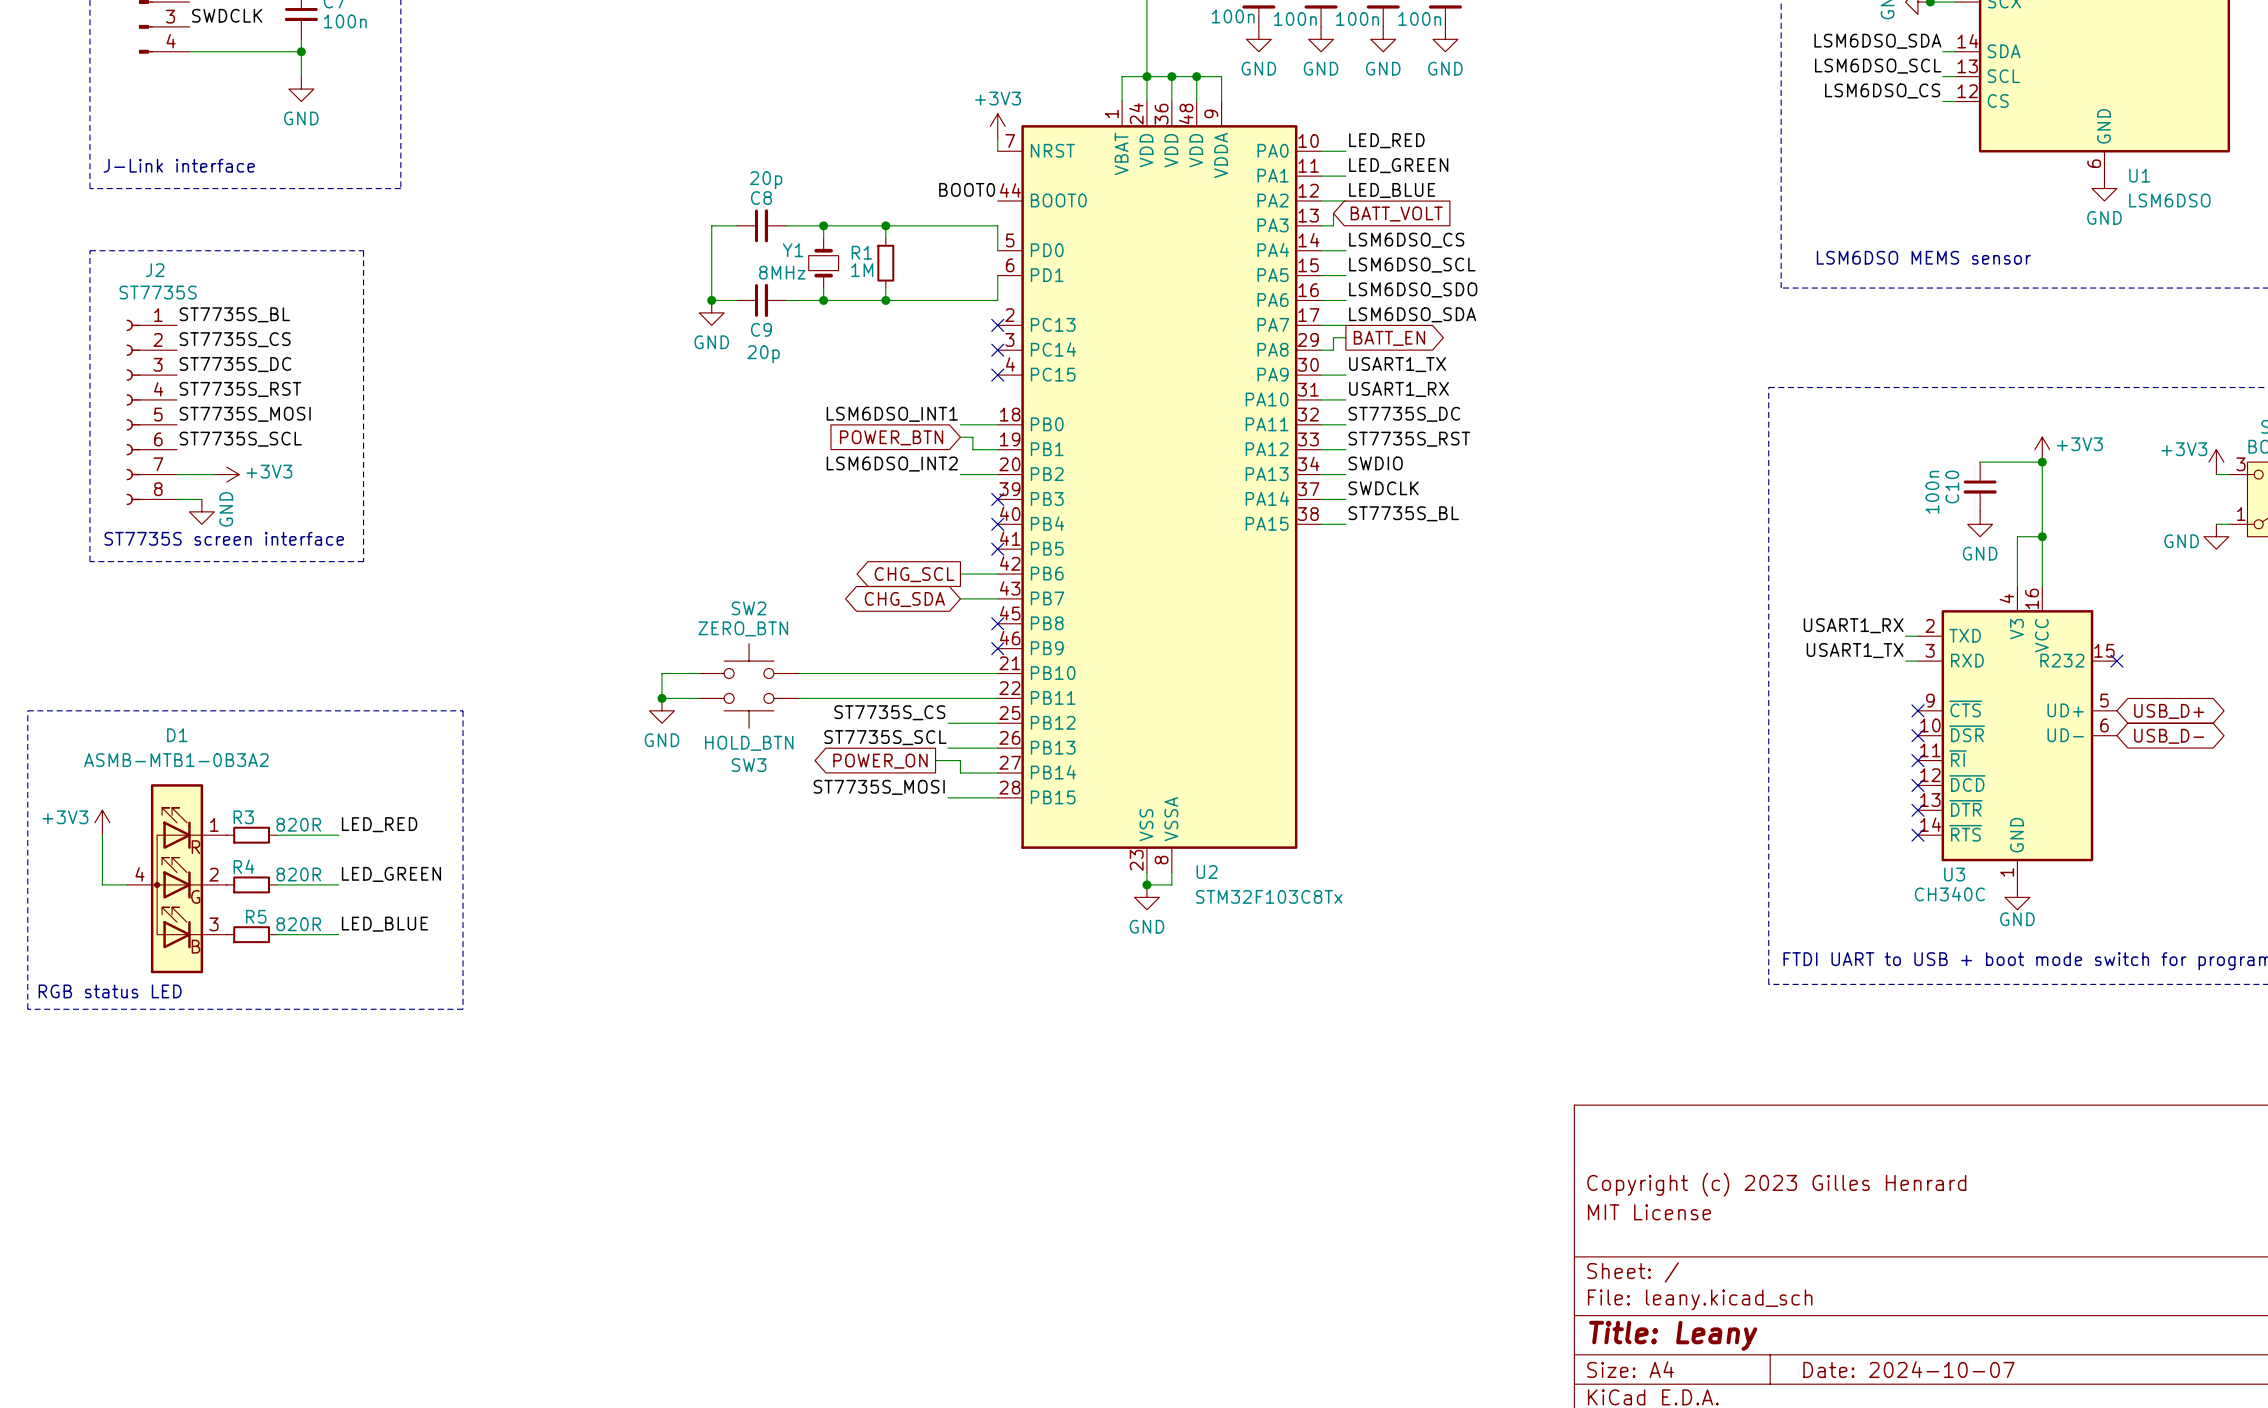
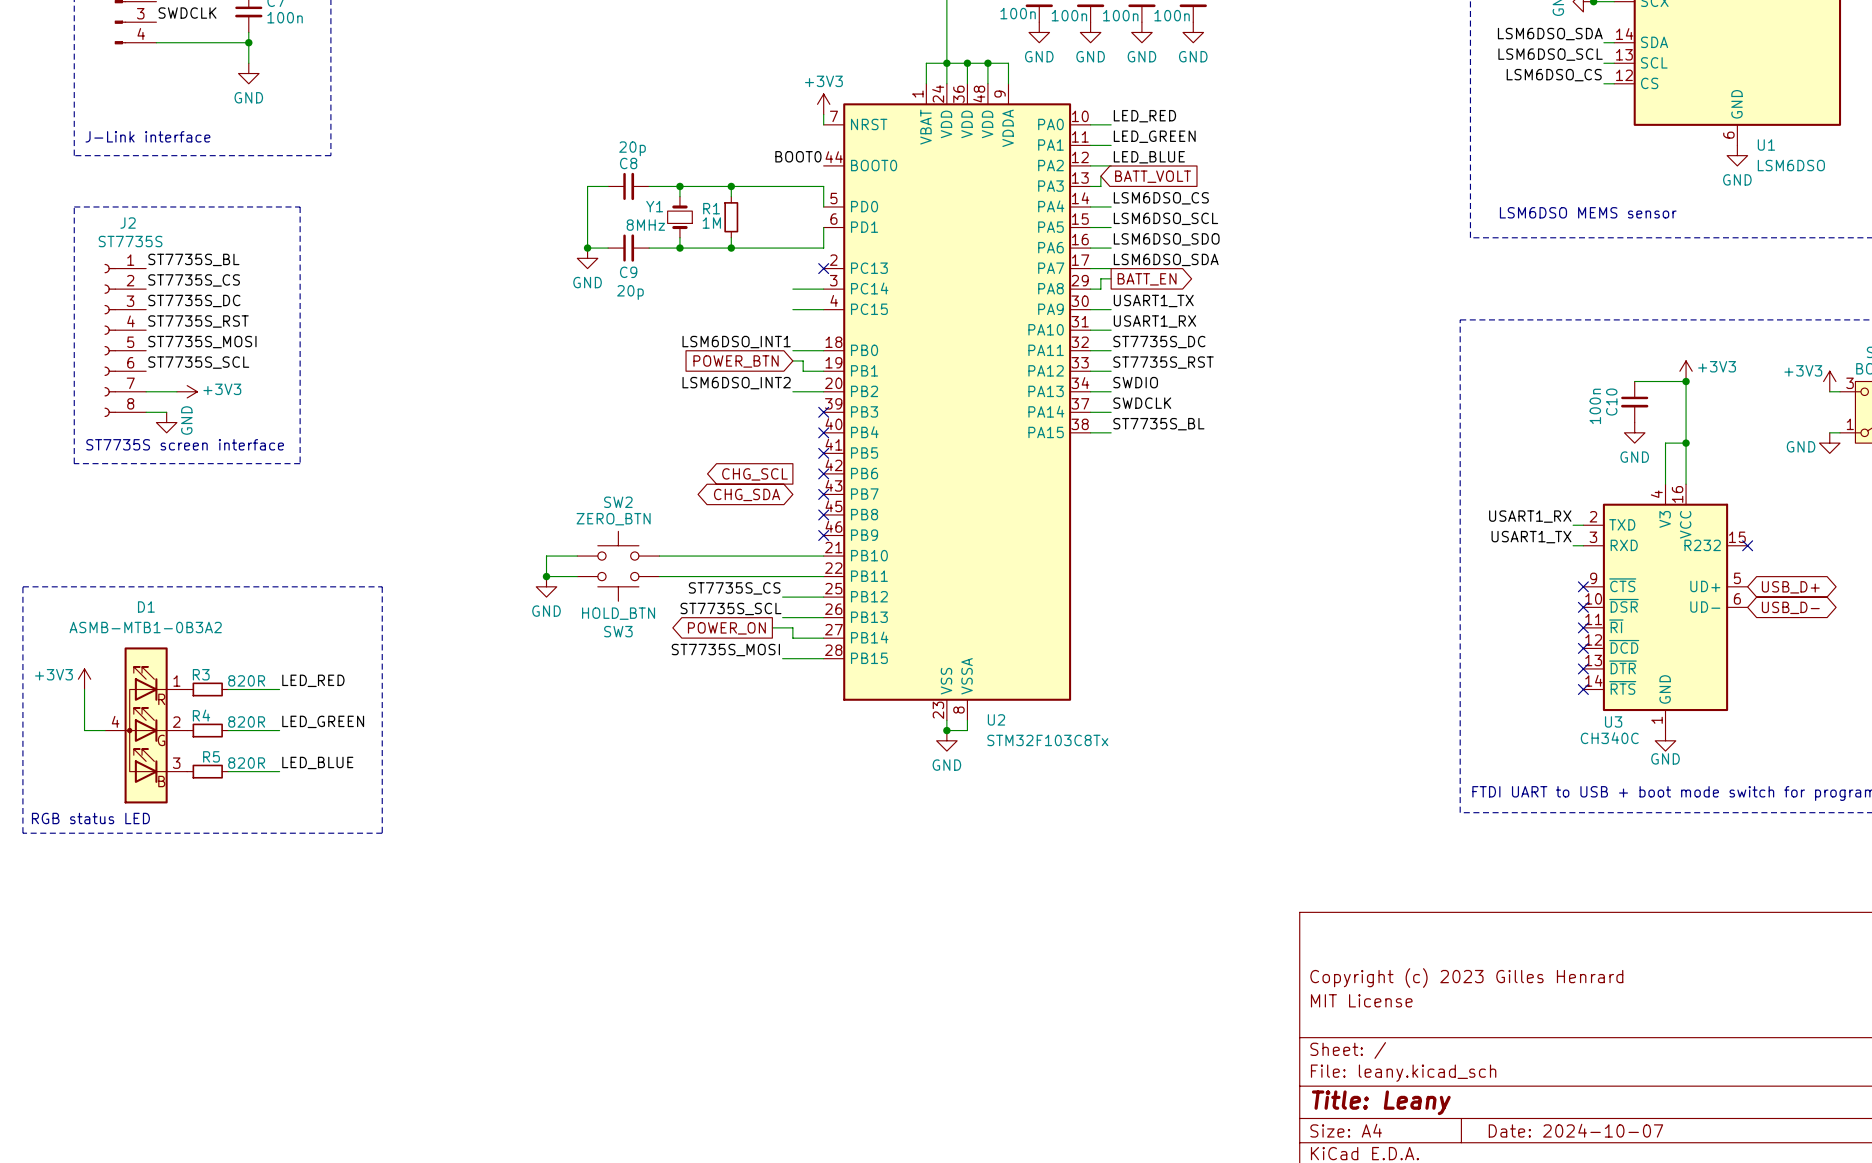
no-connect mark: (997, 350) -> none
no-connect mark: (997, 375) -> none
wire: (960, 574) (997, 574) -> (792, 289) (823, 289)
no-connect mark: none -> (823, 473)
wire: (960, 598) (997, 598) -> (792, 309) (823, 309)
no-connect mark: none -> (823, 494)

